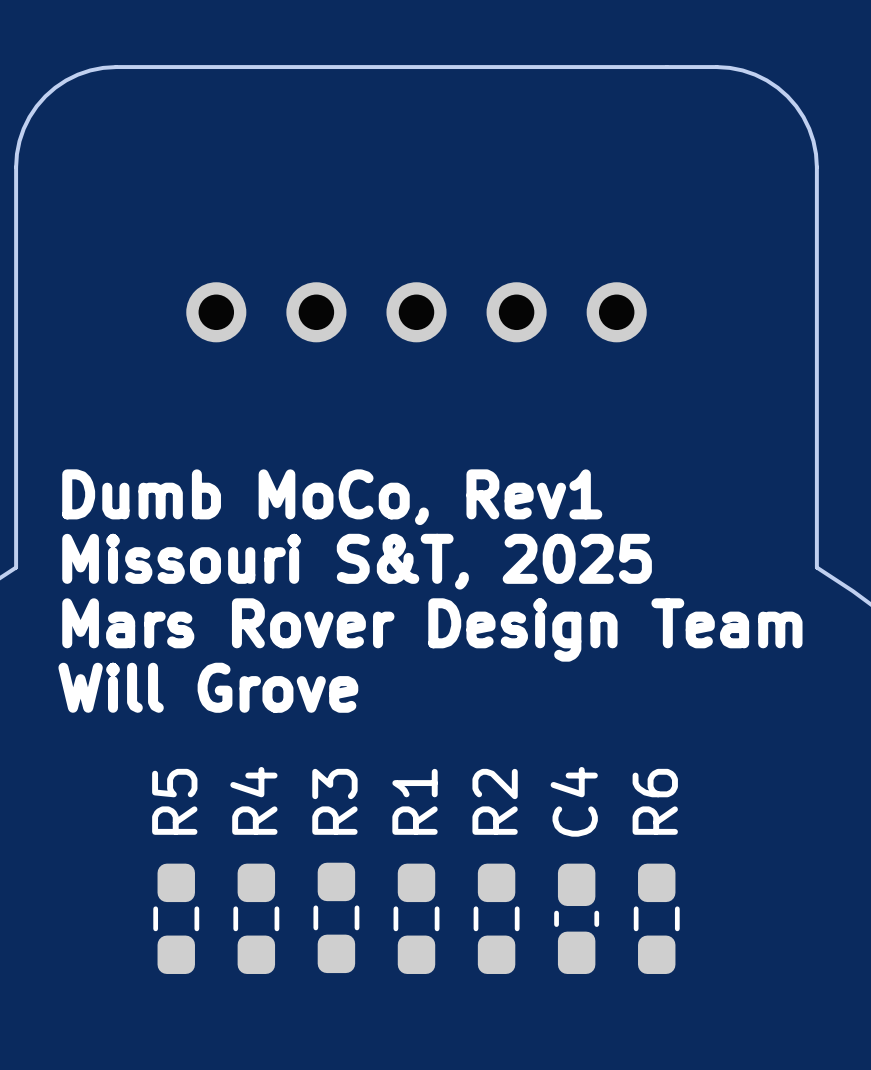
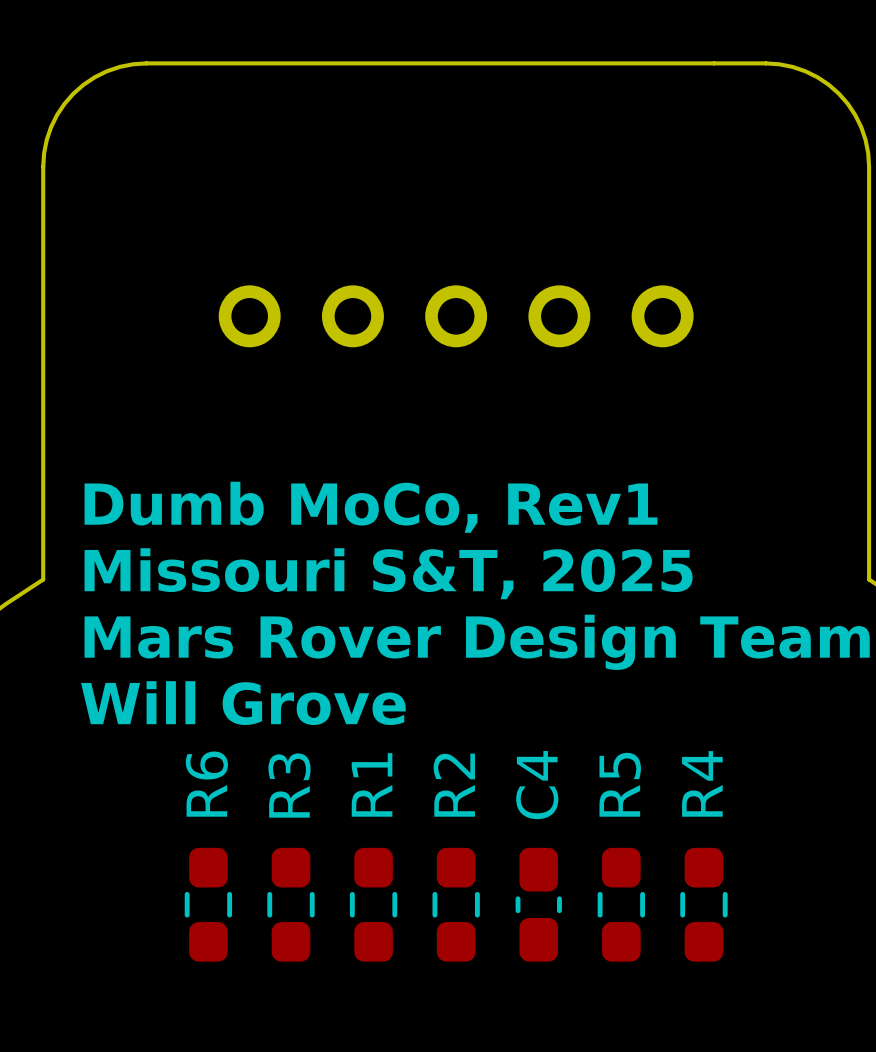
R3 position: (336, 917) -> (290, 904)
R5 position: (176, 918) -> (621, 904)
R4 position: (256, 918) -> (703, 904)
R1 position: (416, 918) -> (373, 904)
R2 position: (496, 918) -> (456, 904)
C4 position: (576, 918) -> (538, 904)
R6 position: (656, 918) -> (208, 904)

